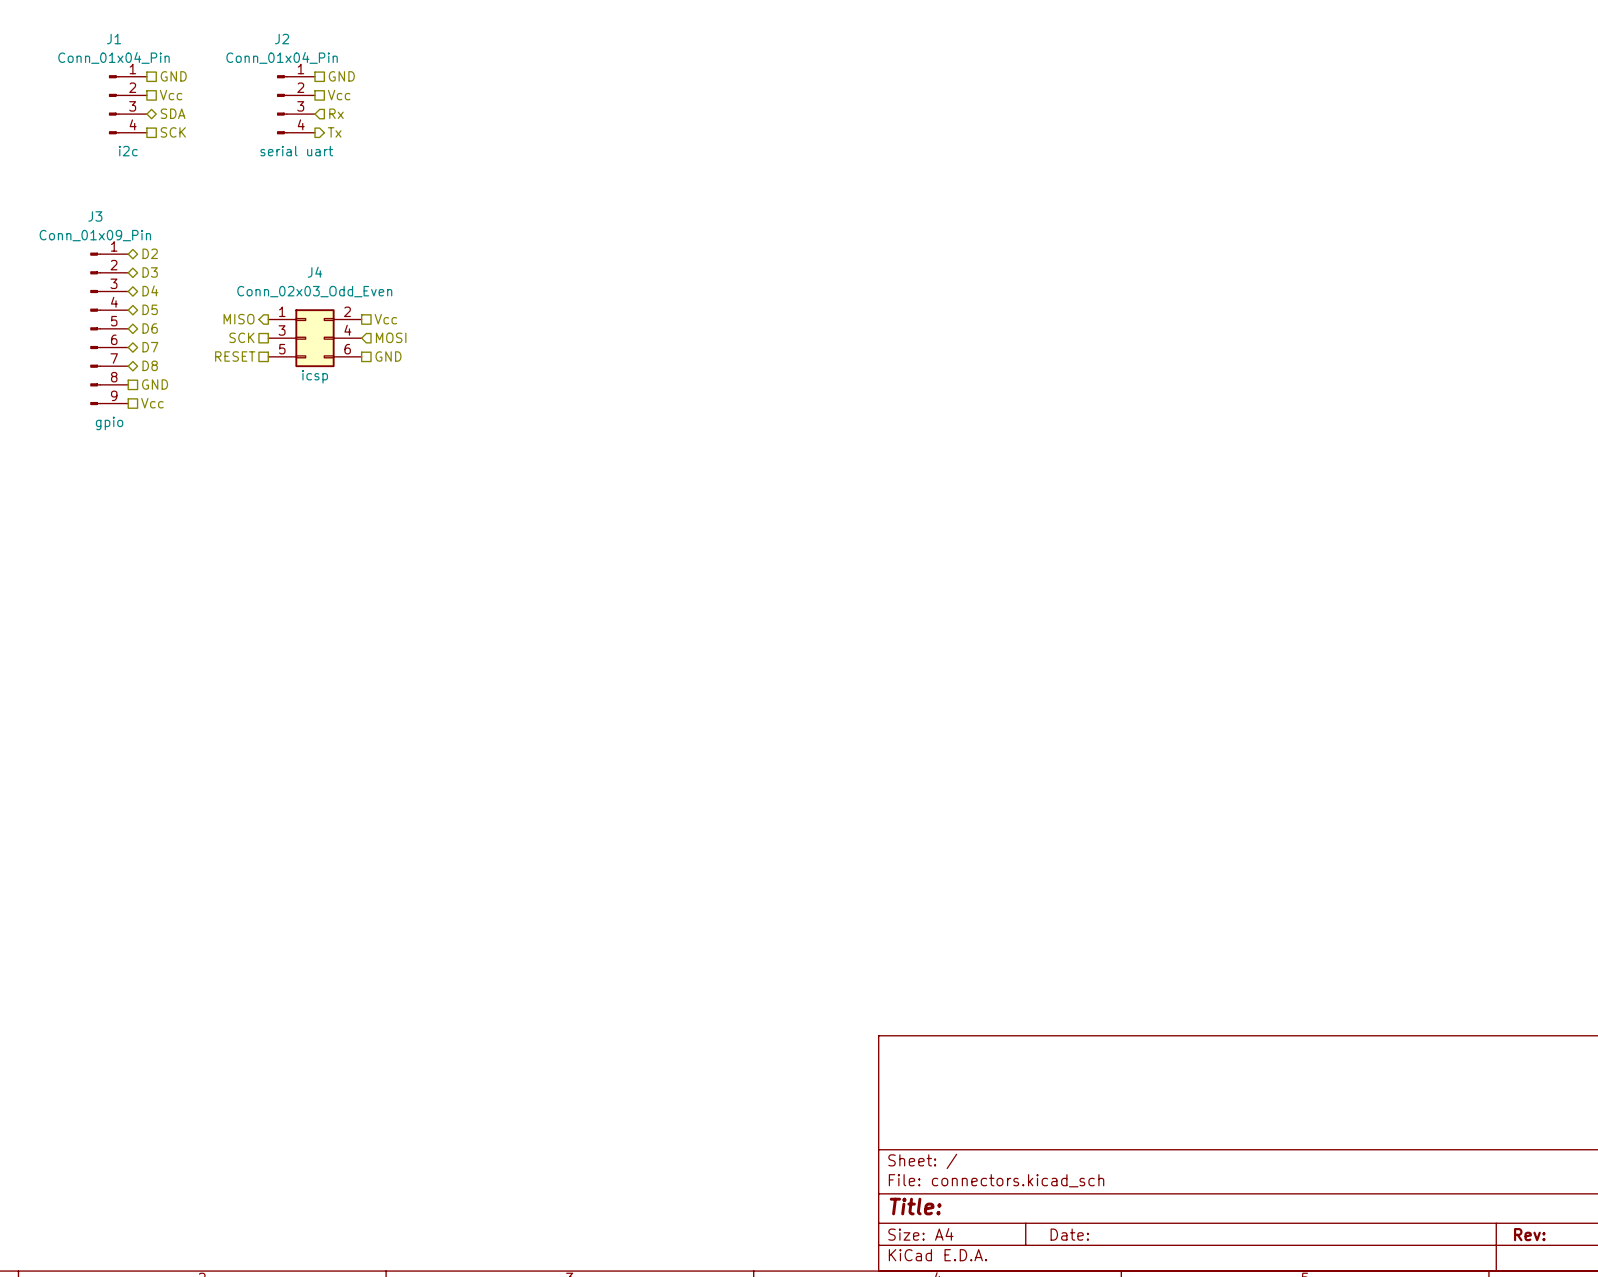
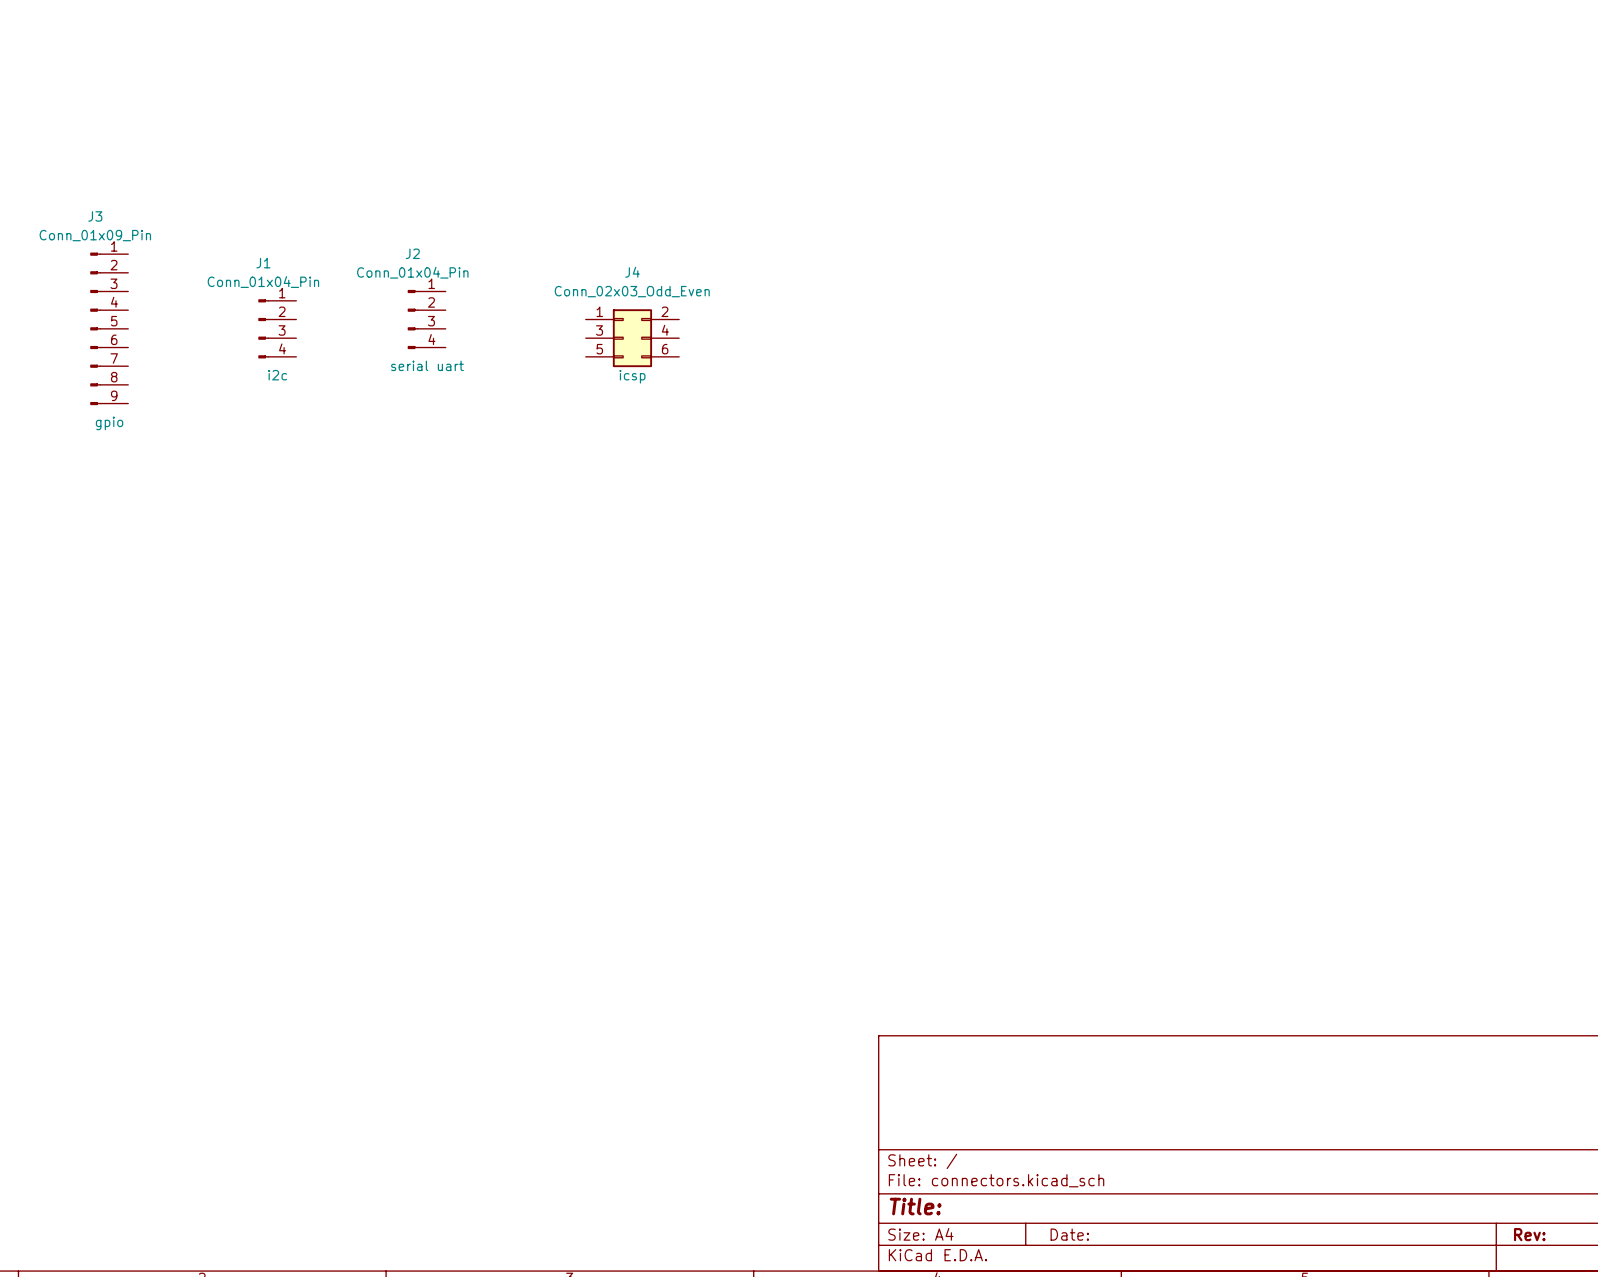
hierarchical label: GND (173, 76) -> none
hierarchical label: GND (341, 76) -> none
hierarchical label: Vcc (171, 95) -> none
hierarchical label: Vcc (339, 95) -> none
J1 position: (127, 104) -> (277, 328)
J2 position: (296, 104) -> (426, 319)
hierarchical label: SDA (173, 113) -> none
hierarchical label: Rx (336, 113) -> none
hierarchical label: SCK (173, 132) -> none
hierarchical label: Tx (334, 132) -> none
hierarchical label: D2 (150, 253) -> none
hierarchical label: D3 (150, 272) -> none
hierarchical label: D4 (150, 290) -> none
hierarchical label: D5 (150, 309) -> none
hierarchical label: MISO (239, 319) -> none
hierarchical label: Vcc (385, 319) -> none
hierarchical label: D6 (150, 328) -> none
hierarchical label: SCK (241, 337) -> none
hierarchical label: MOSI (391, 337) -> none
J4 position: (314, 338) -> (632, 338)
hierarchical label: D7 (150, 347) -> none
hierarchical label: RESET (235, 356) -> none
hierarchical label: GND (388, 356) -> none
hierarchical label: D8 (150, 365) -> none
hierarchical label: GND (155, 384) -> none
hierarchical label: Vcc (152, 403) -> none

